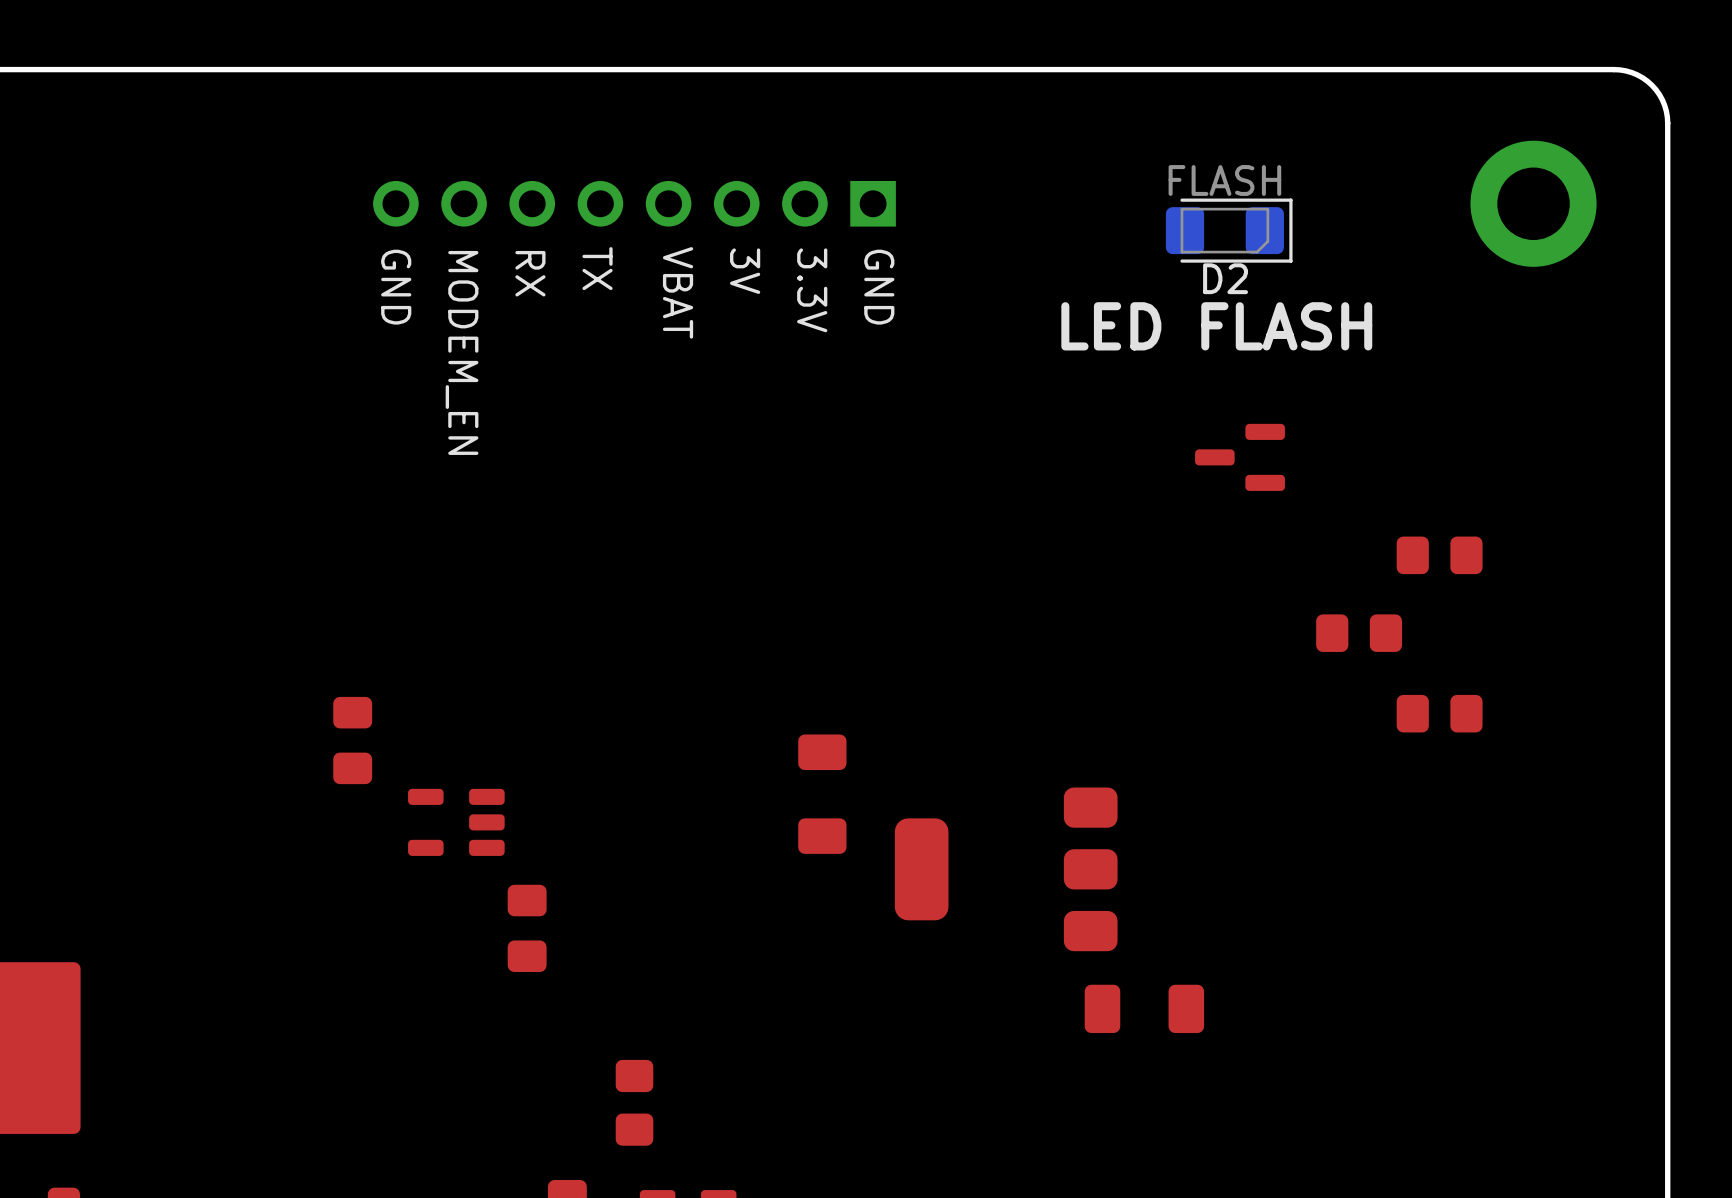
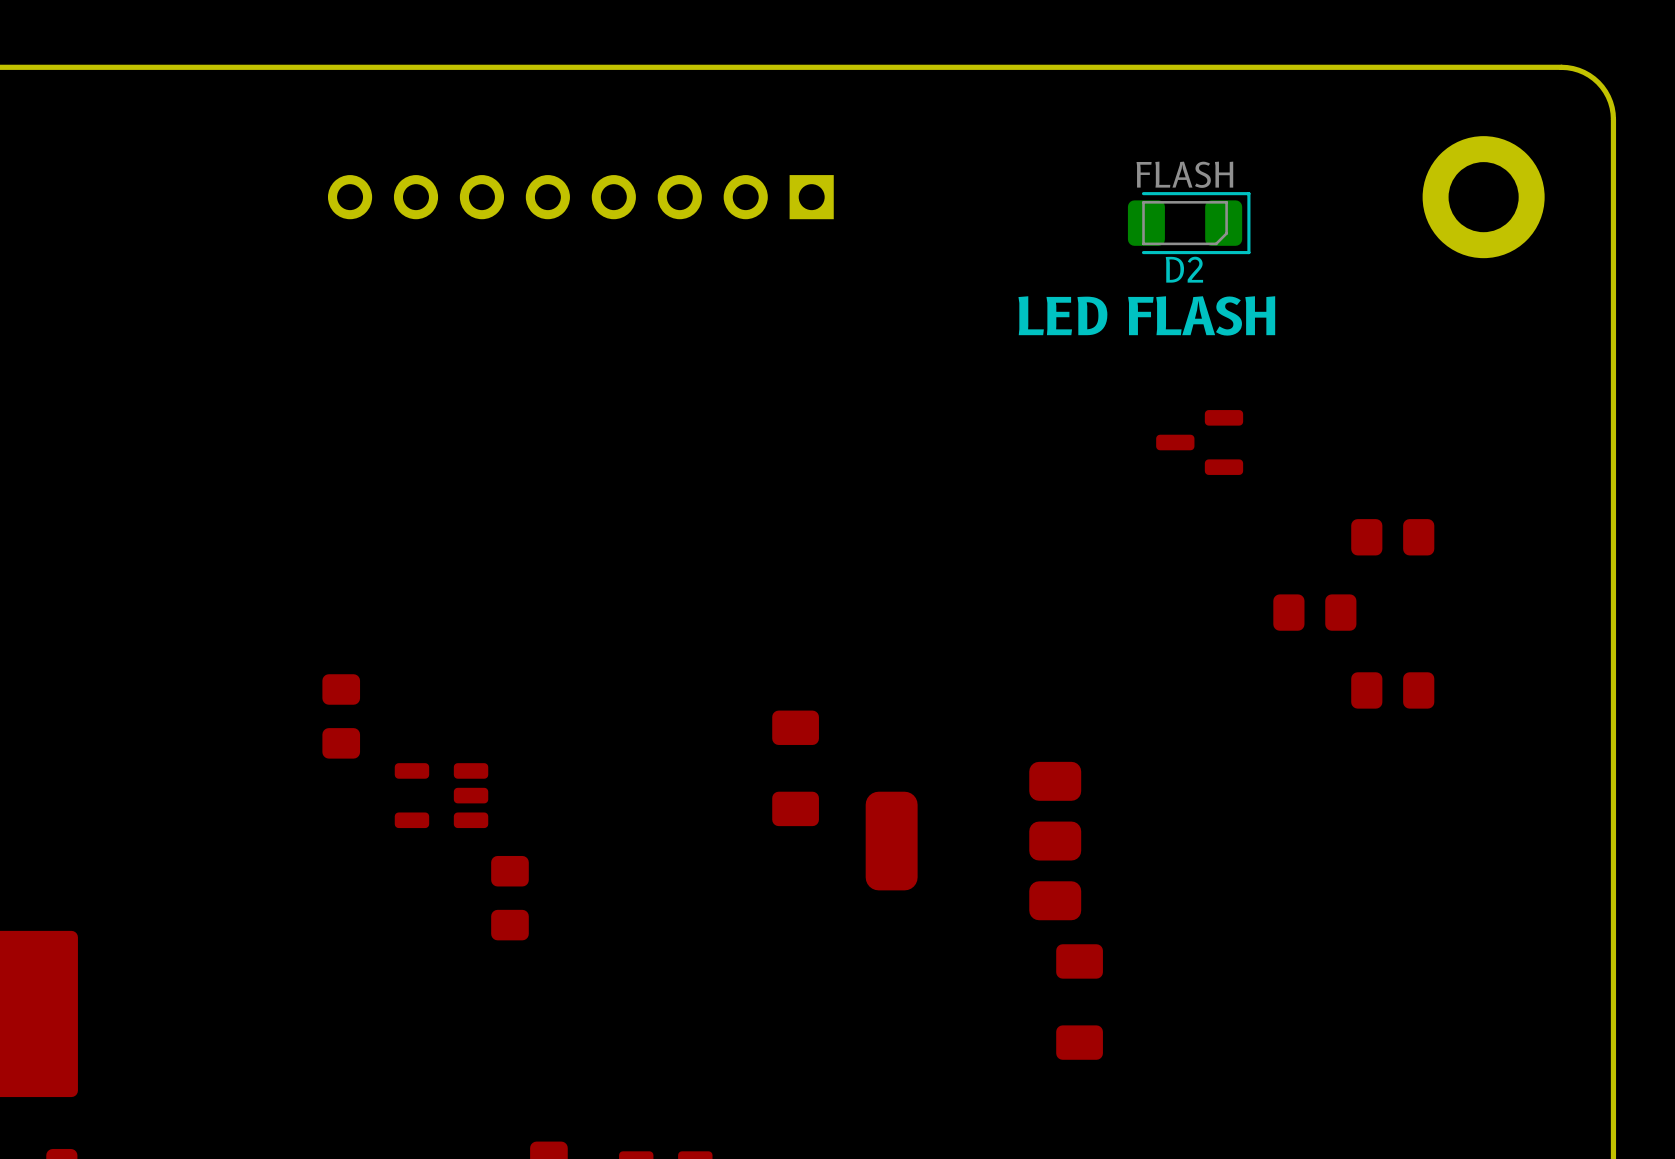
part position: (634, 203) -> (580, 197)
text: TX (597, 268) -> none
text: 3V (745, 271) -> none
text: RX (530, 273) -> none
text: GND (396, 287) -> none
text: GND (879, 287) -> none
text: 3.3V (812, 290) -> none
text: VBAT (678, 292) -> none
text: MODEM_EN (462, 352) -> none
part rotation: 0° (1144, 1008) -> 90° clockwise (1079, 1002)
part: (634, 1102) -> none

